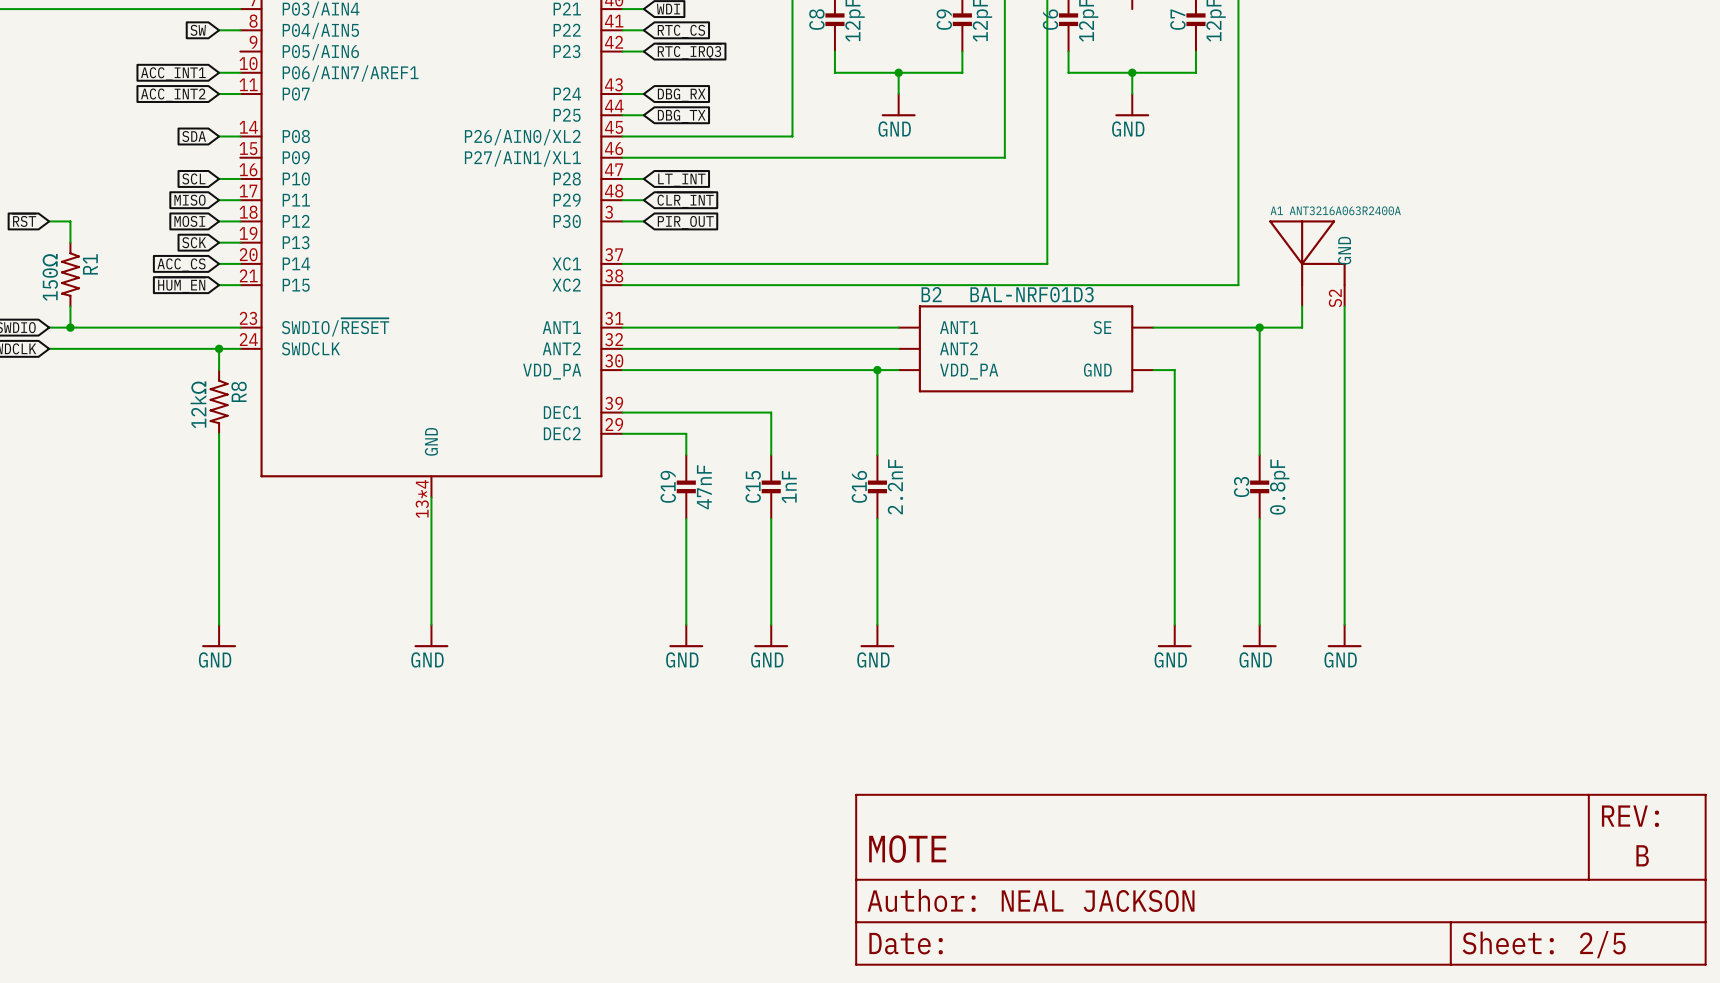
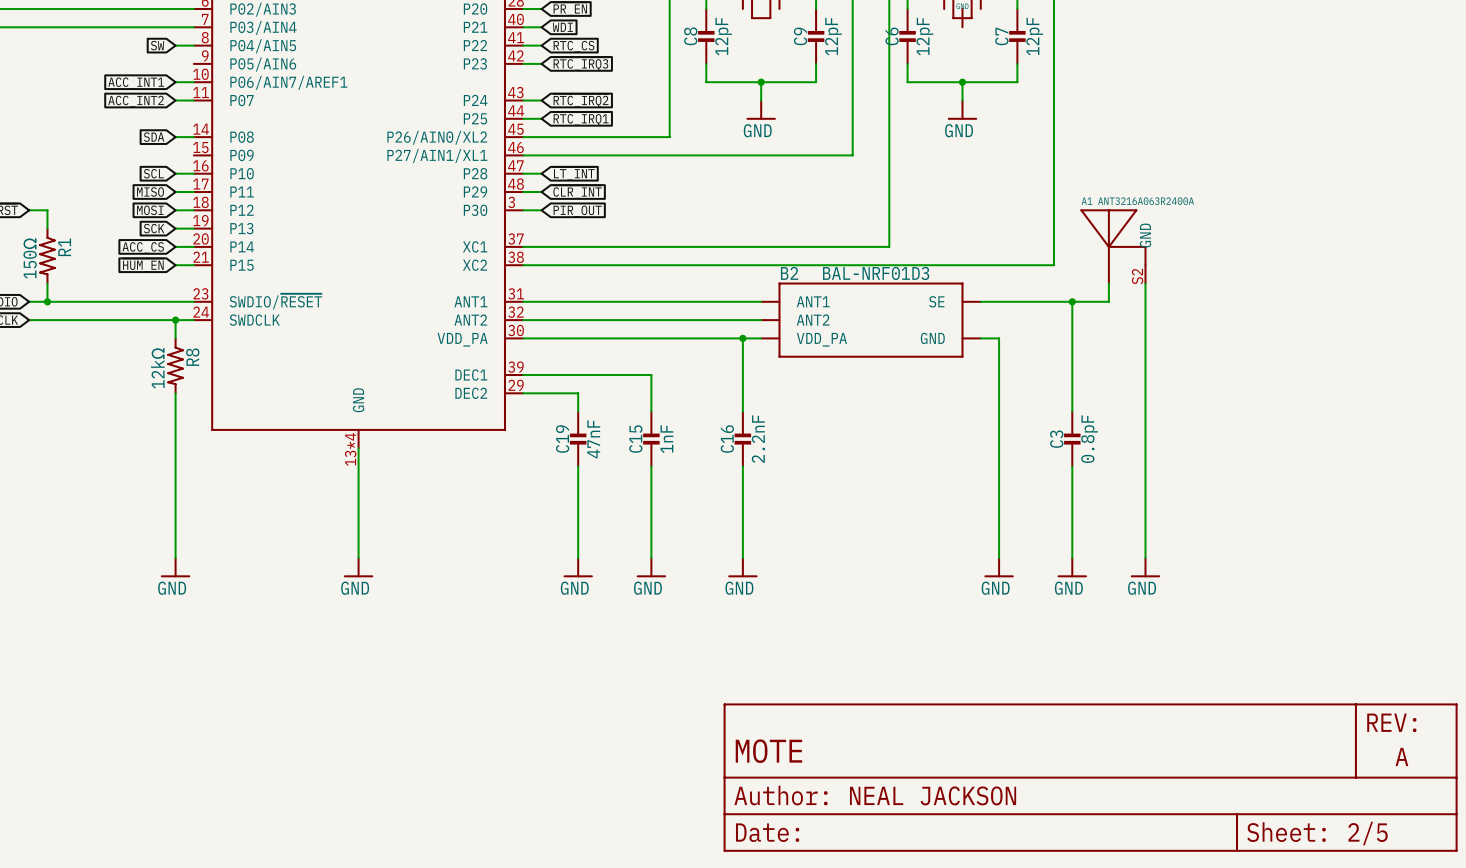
global label: DBG_RX (681, 95) -> ~{RTC_IRQ2} (580, 100)
global label: DBG_TX (681, 116) -> ~{RTC_IRQ1} (581, 118)
part text: B (1642, 855) -> A (1401, 756)

